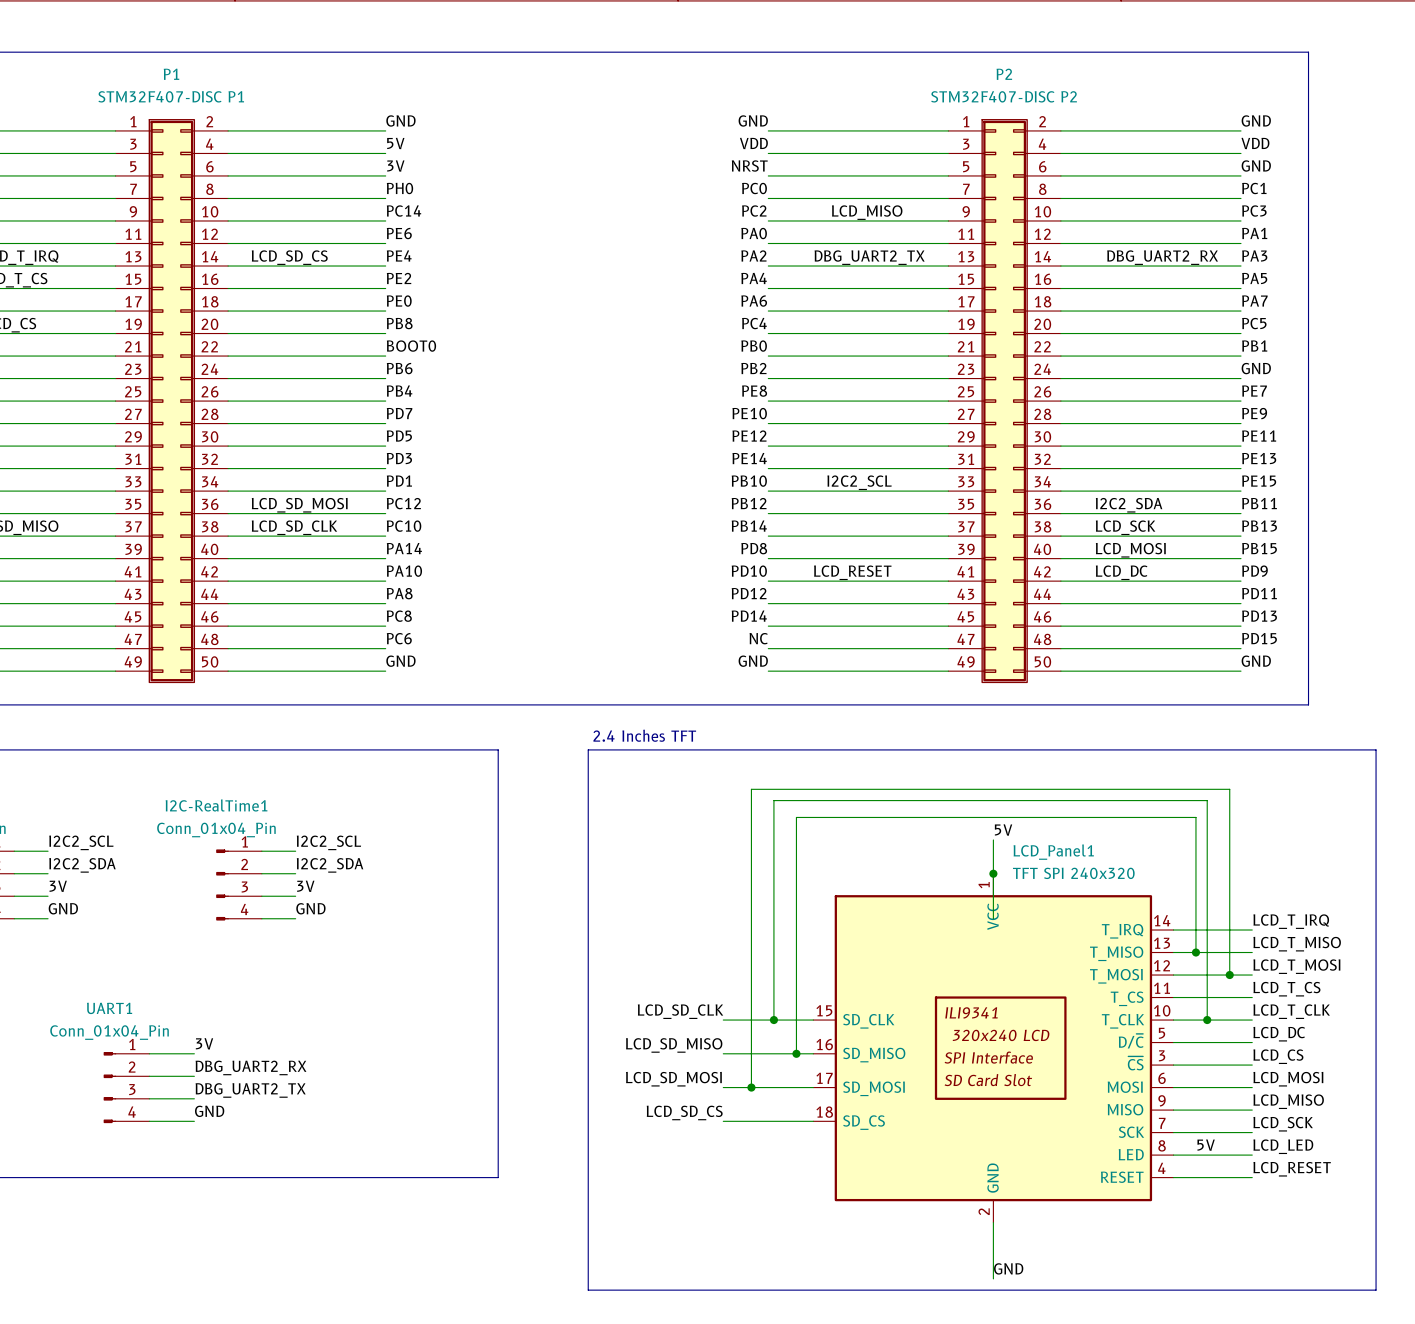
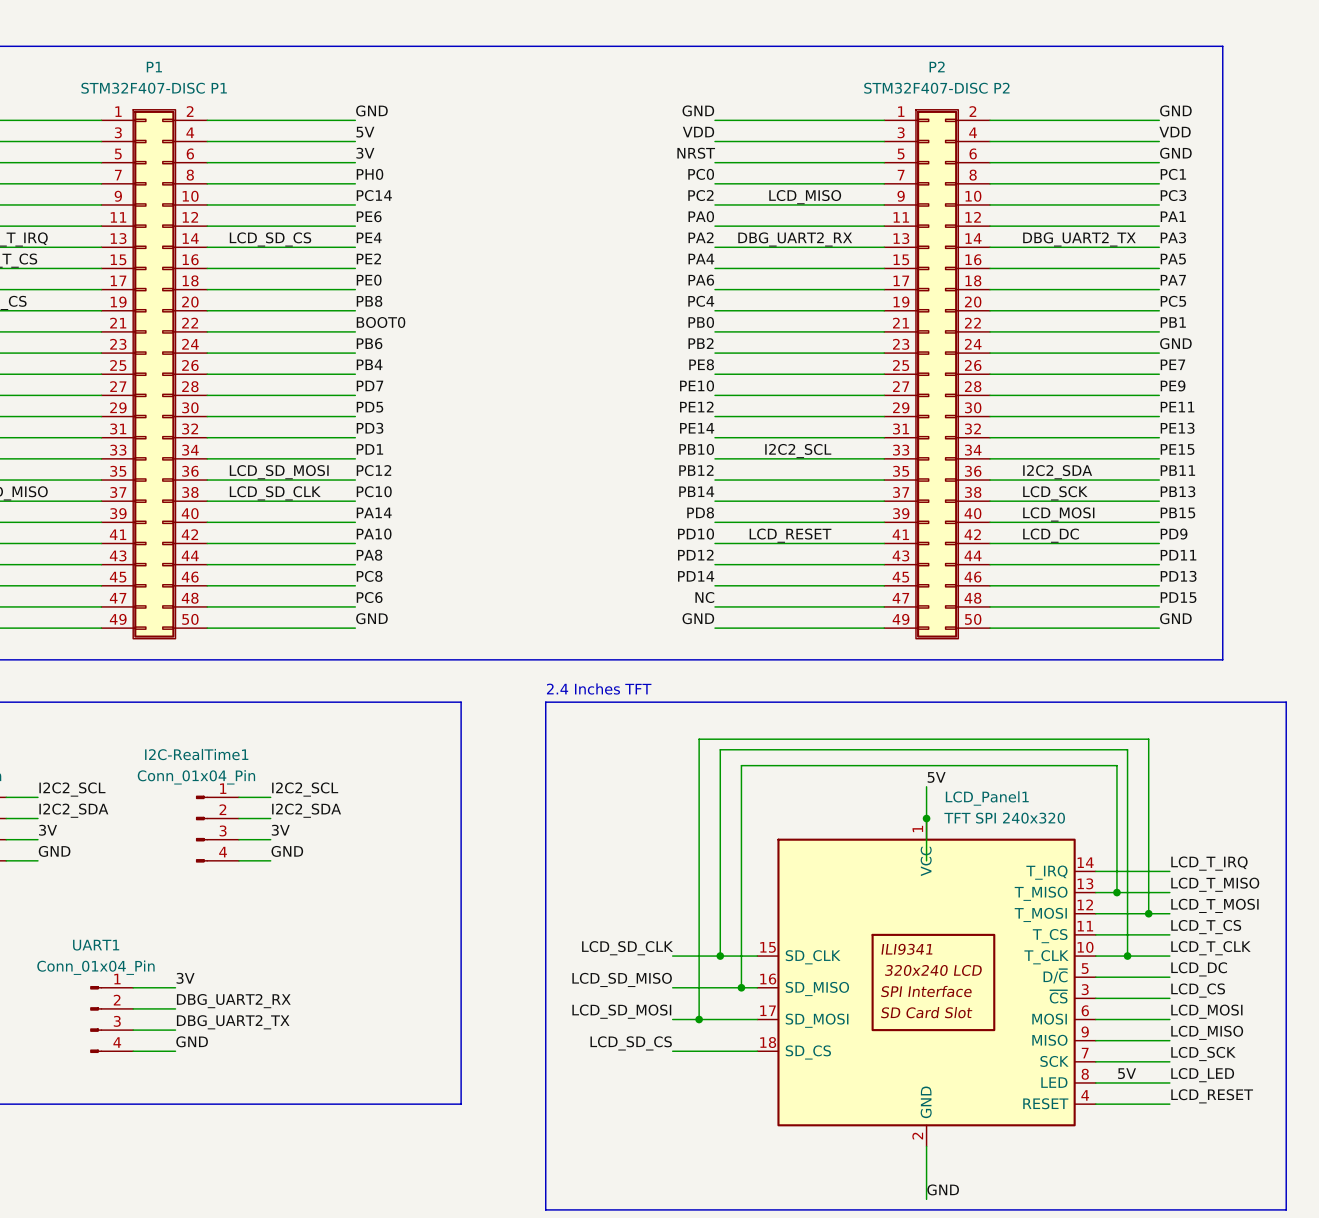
label: DBG_UART2_TX (869, 257) -> DBG_UART2_RX (795, 239)
label: DBG_UART2_RX (1162, 257) -> DBG_UART2_TX (1079, 239)

